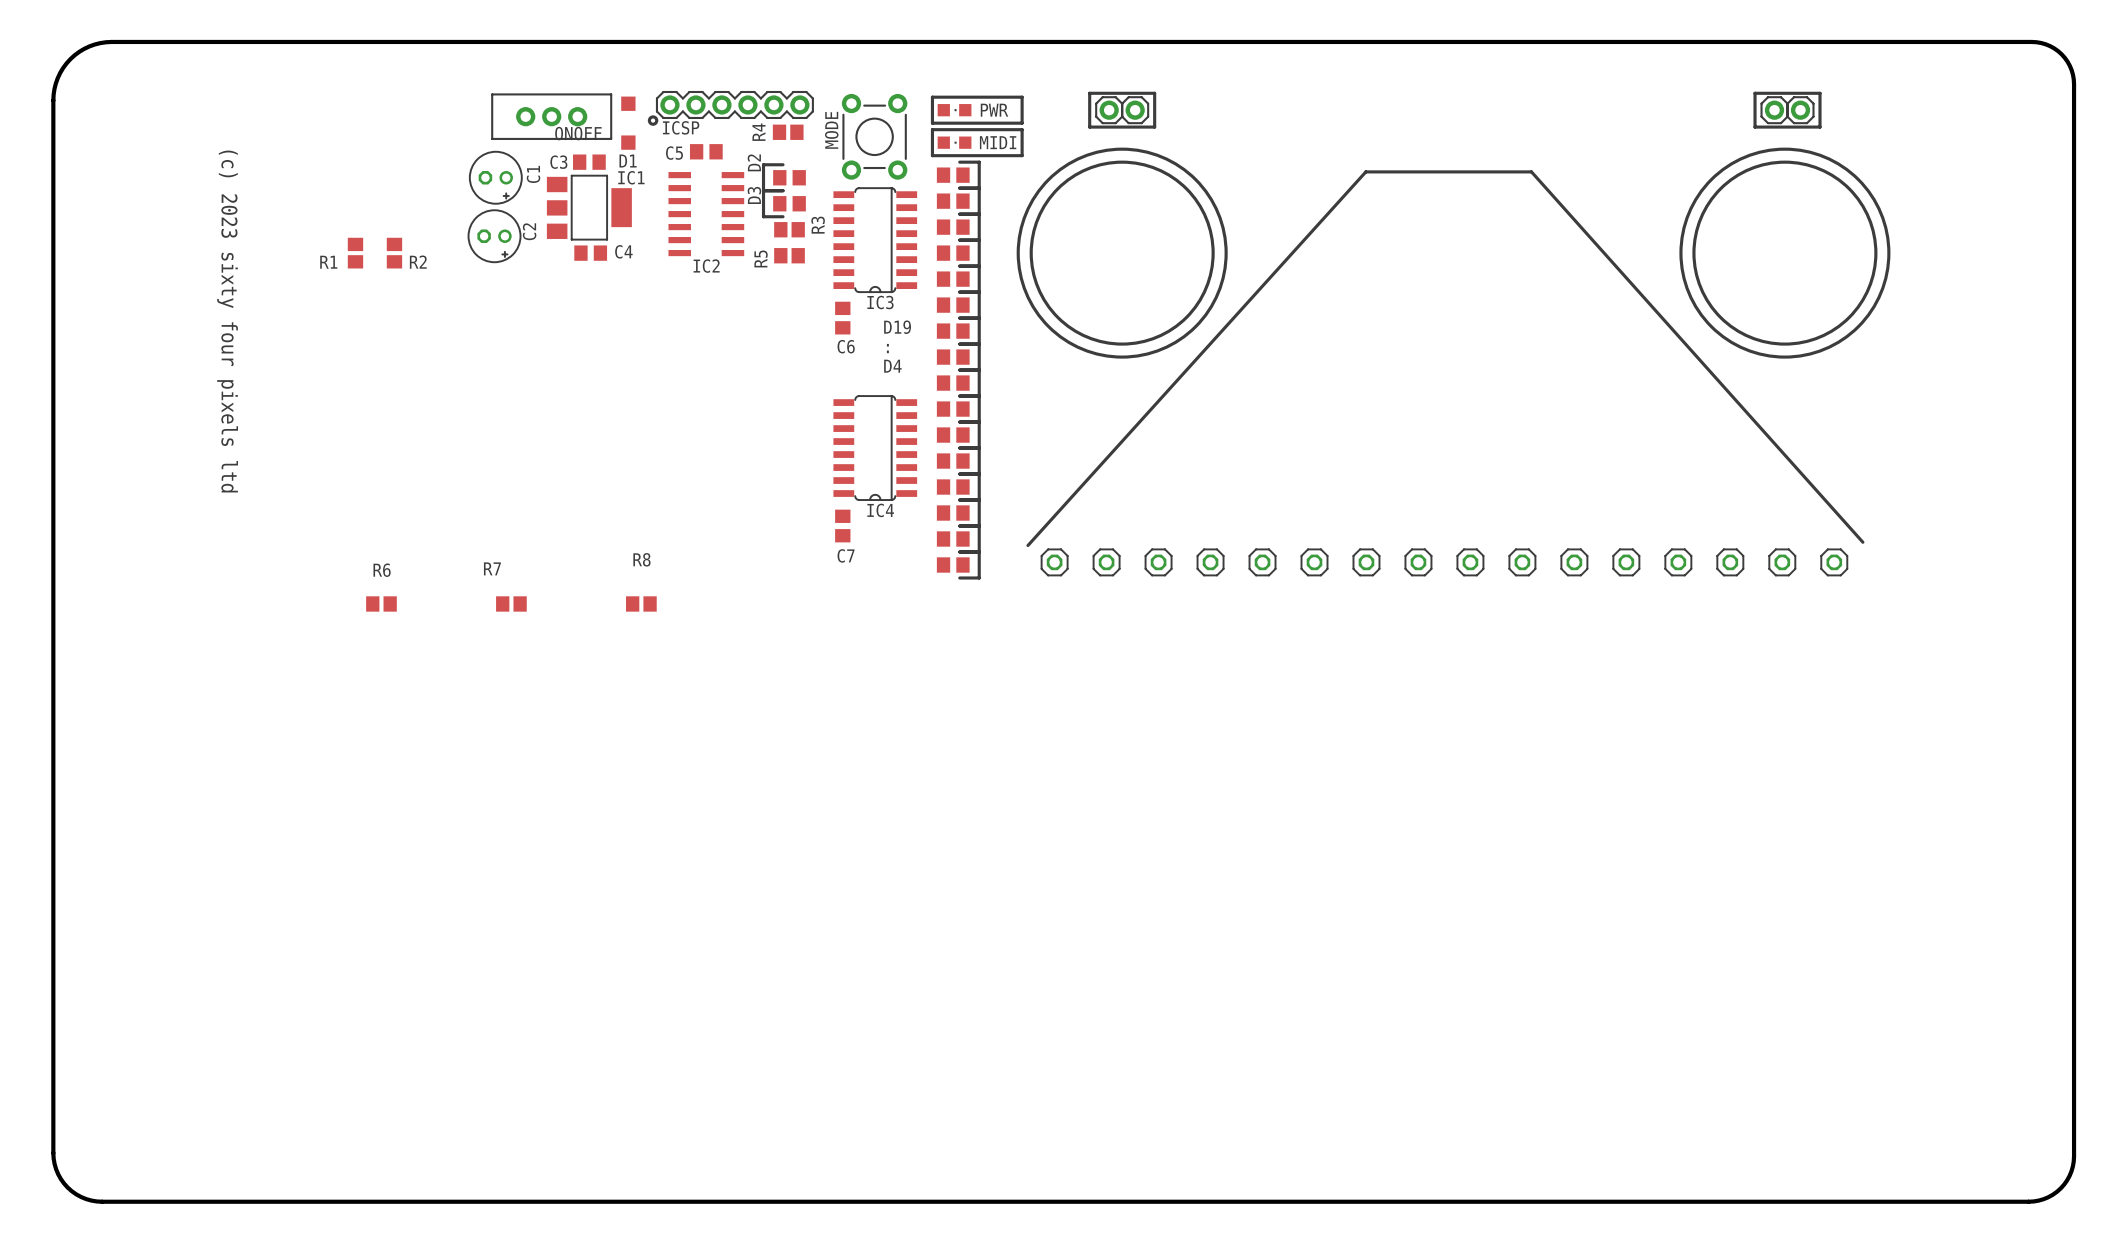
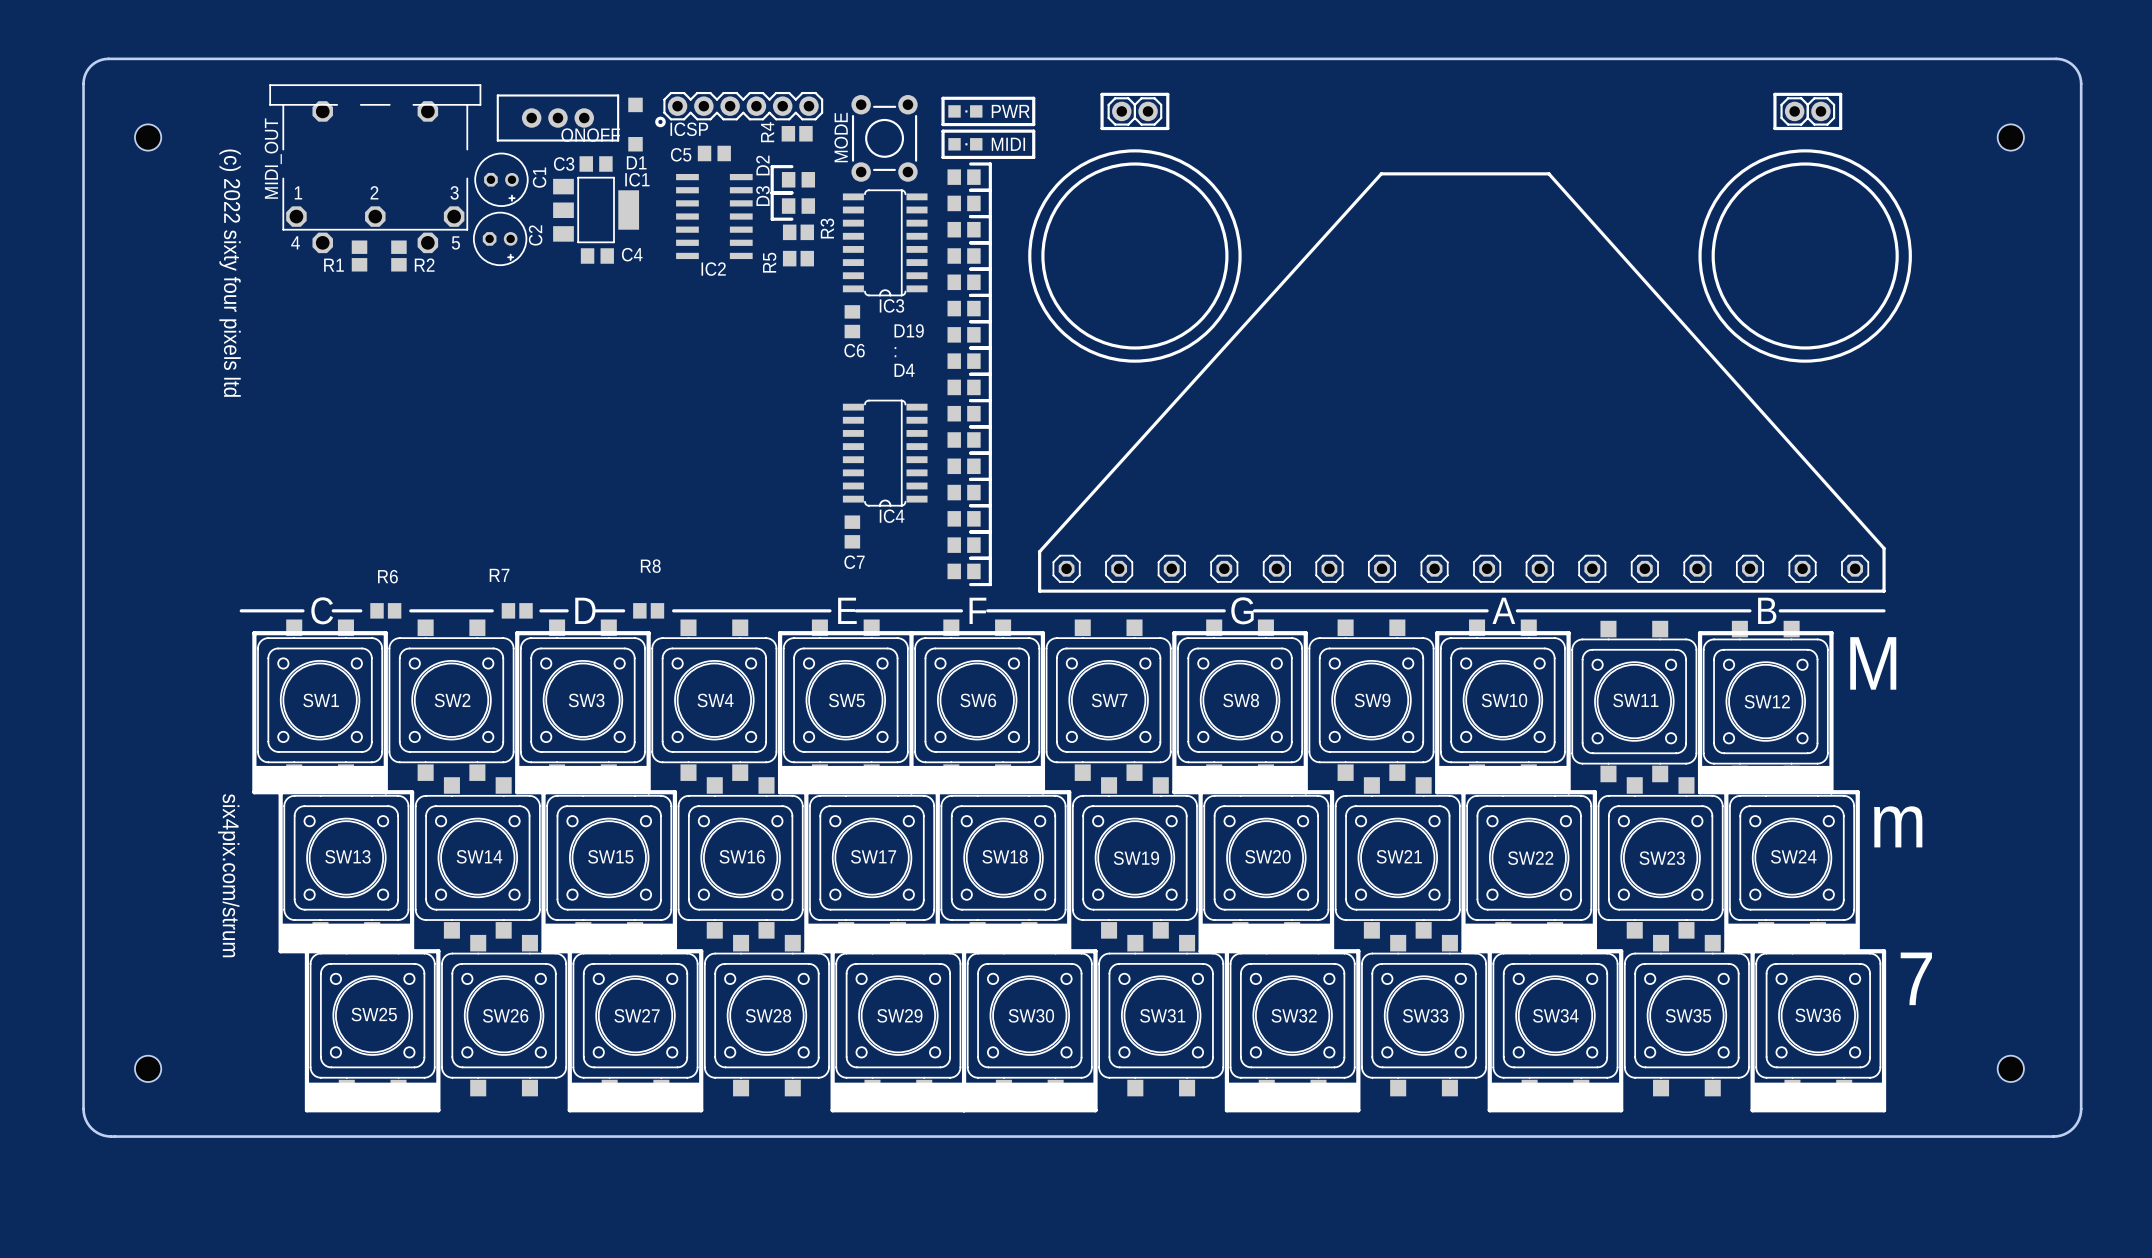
board edge: (111, 41) (2031, 41) (2045, 44) (2054, 48) (2067, 61) (2071, 70) (2074, 84) (2074, 1156) (2072, 1166) (2067, 1180) (2052, 1194) (2038, 1200) (2028, 1201) (102, 1201) (91, 1200) (76, 1194) (63, 1183) (58, 1174) (53, 1153) (53, 100) (57, 78) (70, 59) (89, 46) (111, 41) -> (108, 58) (98, 60) (90, 66) (85, 74) (83, 83) (83, 1108) (87, 1122) (97, 1132) (111, 1136) (2053, 1136) (2067, 1132) (2077, 1122) (2081, 1108) (2081, 83) (2077, 71) (2068, 62) (2056, 58) (108, 58)
hole: none -> (148, 137)
hole: none -> (2010, 137)
MIDI_OUT: none -> (375, 168)
text: (c) 2023 sixty four pixels ltd (227, 321) -> (c) 2022 sixty four pixels ltd (230, 273)
line: none -> (1884, 548) (1884, 591) (1039, 591) (1039, 551)
line: none -> (241, 610) (303, 610)
line: none -> (333, 610) (360, 610)
line: none -> (410, 610) (492, 610)
line: none -> (540, 610) (567, 610)
text: none -> D (585, 610)
line: none -> (596, 610) (623, 610)
line: none -> (673, 610) (830, 610)
text: none -> E (847, 610)
line: none -> (856, 610) (961, 610)
text: none -> F (977, 610)
line: none -> (987, 610) (1224, 610)
line: none -> (1254, 610) (1487, 610)
text: none -> A (1503, 610)
line: none -> (1517, 610) (1749, 610)
text: none -> B (1767, 610)
line: none -> (1780, 610) (1884, 610)
text: none -> C (322, 610)
text: none -> G (1242, 610)
line: none -> (911, 633) (911, 792)
text: none -> M (1873, 663)
SW1: none -> (320, 700)
SW2: none -> (451, 700)
SW3: none -> (582, 700)
SW4: none -> (714, 700)
SW5: none -> (845, 700)
SW6: none -> (977, 700)
SW7: none -> (1108, 700)
SW8: none -> (1240, 700)
SW9: none -> (1371, 700)
SW10: none -> (1502, 700)
SW11: none -> (1634, 701)
SW12: none -> (1765, 701)
drawing: none -> [254, 765, 386, 793]
drawing: none -> [517, 765, 649, 793]
drawing: none -> [780, 765, 1043, 793]
drawing: none -> [1174, 765, 1306, 793]
drawing: none -> [1437, 765, 1569, 793]
drawing: none -> [1700, 765, 1832, 793]
line: none -> (280, 792) (280, 951) (438, 951) (438, 1110) (306, 1110) (306, 951)
line: none -> (385, 792) (385, 633) (254, 633) (254, 792) (412, 792) (412, 951)
line: none -> (543, 792) (543, 951) (701, 951) (701, 1110) (569, 1110) (569, 951)
line: none -> (648, 792) (648, 633) (517, 633) (517, 792) (674, 792) (674, 951)
line: none -> (806, 792) (806, 951) (1095, 951) (1095, 1110) (832, 1110) (832, 951)
line: none -> (937, 792) (937, 951)
line: none -> (1042, 792) (1042, 633) (780, 633) (780, 792) (1069, 792) (1069, 951)
line: none -> (1200, 792) (1200, 951) (1358, 951) (1358, 1110) (1226, 1110) (1226, 951)
line: none -> (1305, 792) (1305, 633) (1174, 633) (1174, 792) (1332, 792) (1332, 951)
line: none -> (1463, 792) (1463, 951) (1621, 951) (1621, 1110) (1489, 1110) (1489, 951)
line: none -> (1568, 792) (1568, 633) (1437, 633) (1437, 792) (1594, 792) (1594, 951)
line: none -> (1726, 792) (1726, 951) (1884, 951) (1884, 1110) (1752, 1110) (1752, 951)
line: none -> (1831, 792) (1831, 633) (1700, 633) (1700, 792) (1857, 792) (1857, 951)
text: none -> m (1898, 826)
SW13: none -> (346, 857)
SW14: none -> (477, 857)
SW15: none -> (609, 857)
SW16: none -> (740, 857)
SW17: none -> (872, 857)
SW18: none -> (1003, 857)
SW19: none -> (1134, 857)
SW20: none -> (1266, 857)
SW21: none -> (1397, 857)
SW22: none -> (1529, 857)
SW23: none -> (1660, 857)
SW24: none -> (1792, 857)
text: none -> six4pix.com/strum (228, 875)
drawing: none -> [280, 923, 413, 950]
drawing: none -> [543, 923, 675, 950]
drawing: none -> [806, 923, 1070, 950]
drawing: none -> [1200, 923, 1333, 950]
drawing: none -> [1463, 923, 1595, 950]
drawing: none -> [1726, 923, 1858, 950]
line: none -> (964, 951) (964, 1110)
text: none -> 7 (1916, 978)
SW25: none -> (372, 1015)
SW26: none -> (504, 1015)
SW27: none -> (635, 1015)
SW28: none -> (766, 1015)
SW29: none -> (898, 1015)
SW30: none -> (1029, 1015)
SW31: none -> (1161, 1015)
SW32: none -> (1292, 1015)
SW33: none -> (1424, 1015)
SW34: none -> (1555, 1015)
SW35: none -> (1686, 1015)
SW36: none -> (1818, 1015)
hole: none -> (148, 1068)
hole: none -> (2010, 1068)
drawing: none -> [306, 1082, 439, 1109]
drawing: none -> [569, 1082, 702, 1109]
drawing: none -> [832, 1082, 1096, 1109]
drawing: none -> [1226, 1082, 1359, 1109]
drawing: none -> [1489, 1082, 1622, 1109]
drawing: none -> [1752, 1082, 1885, 1109]

